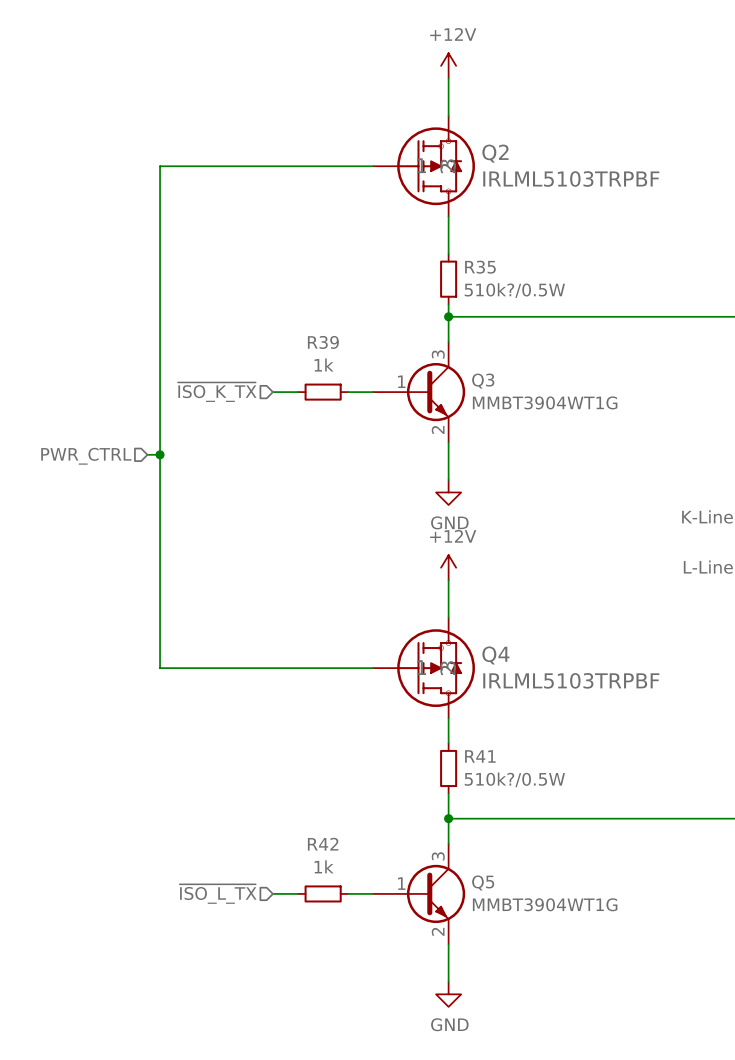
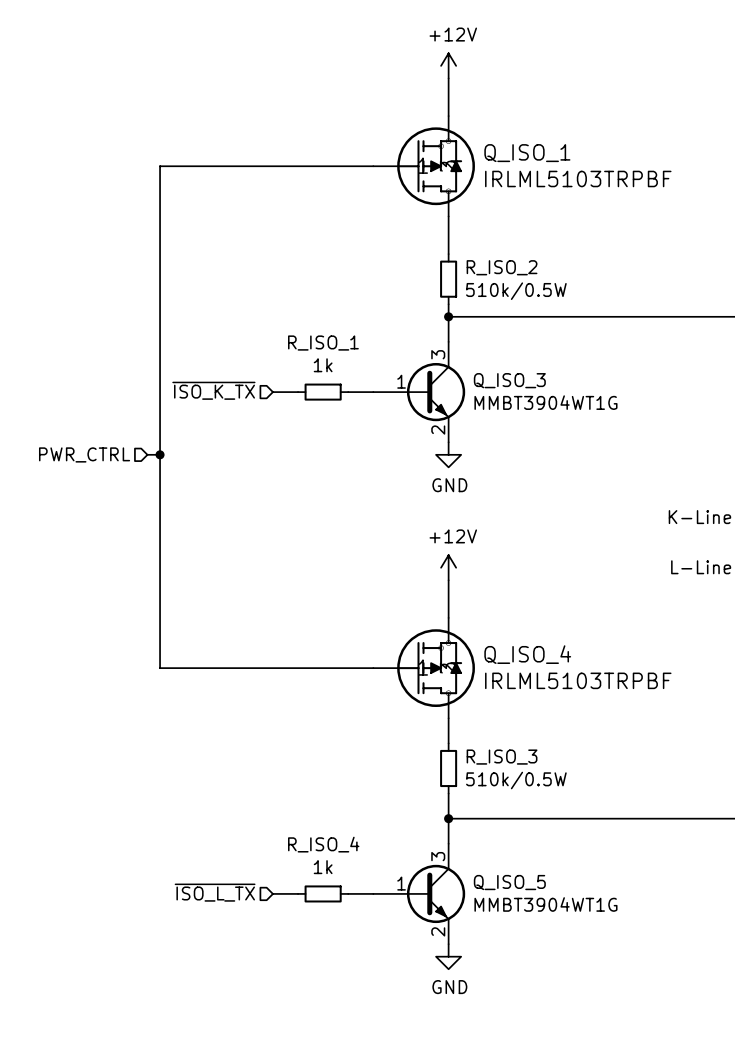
Q2 name: Q2 (495, 153) -> Q_ISO_1 (527, 153)
R35 name: R35 (480, 267) -> R_ISO_2 (502, 267)
R35 value: 510k?/0.5W (514, 290) -> 510k/0.5W (516, 291)
R39 name: R39 (323, 342) -> R_ISO_1 (323, 343)
Q3 name: Q3 (483, 381) -> Q_ISO_3 (509, 380)
wire: (448, 442) (448, 479) -> none
power symbol position: GND (448, 492) -> GND (448, 454)
Q4 name: Q4 (495, 655) -> Q_ISO_4 (527, 654)
R41 name: R41 (480, 756) -> R_ISO_3 (502, 757)
R41 value: 510k?/0.5W (514, 779) -> 510k/0.5W (516, 780)
R42 name: R42 (323, 844) -> R_ISO_4 (323, 844)
Q5 name: Q5 (483, 882) -> Q_ISO_5 (509, 882)
wire: (448, 944) (448, 981) -> none
power symbol position: GND (448, 994) -> GND (448, 956)

